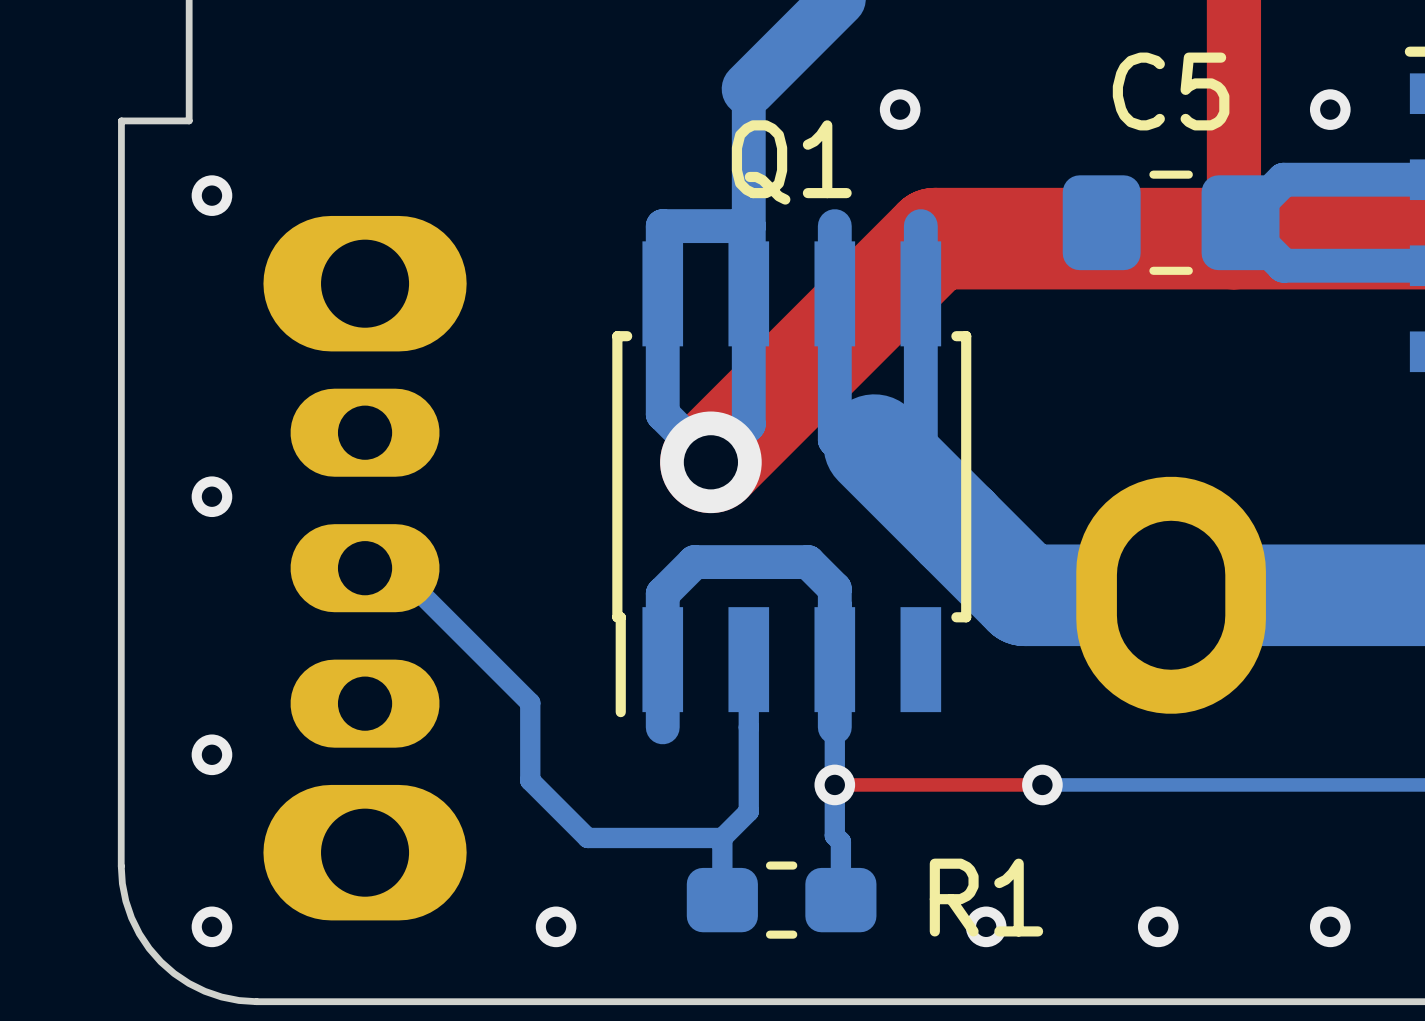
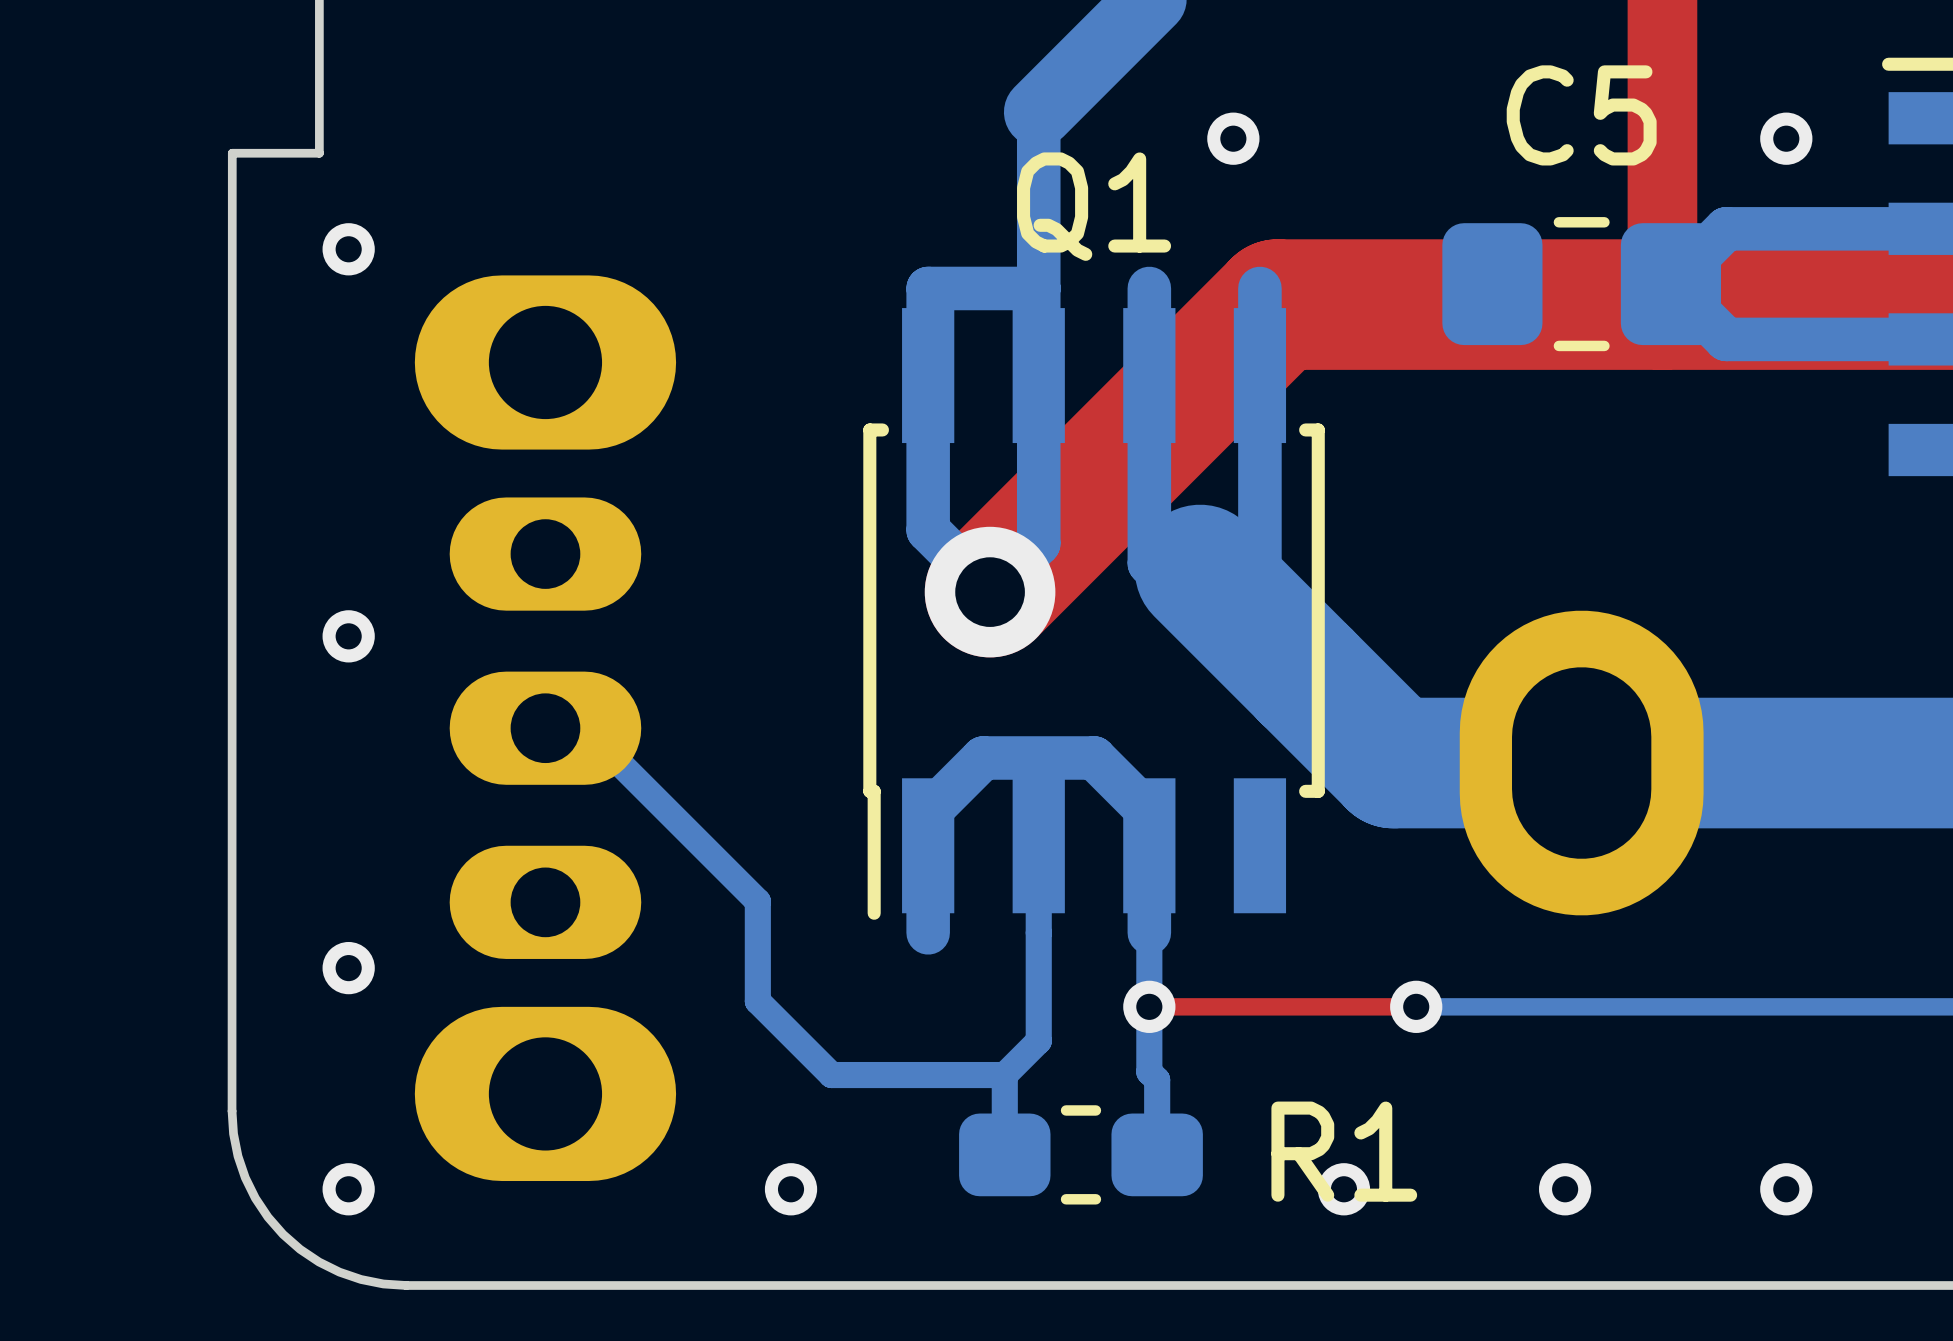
bottom track: (834, 634) (834, 588) (808, 562) (694, 562) (662, 593) (662, 634) -> (1149, 813) (1094, 757) (983, 757) (928, 813)

